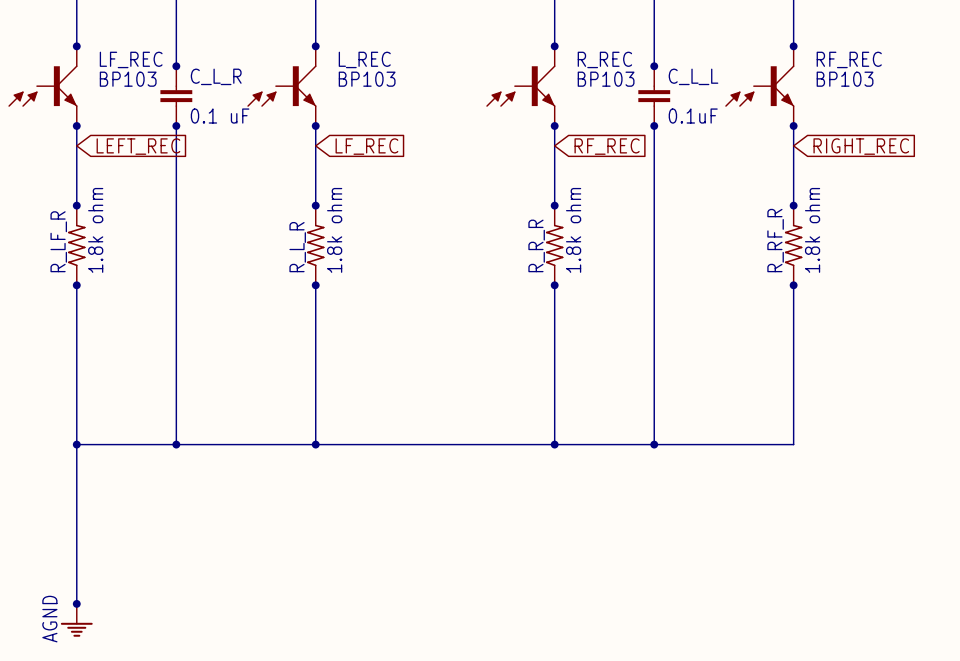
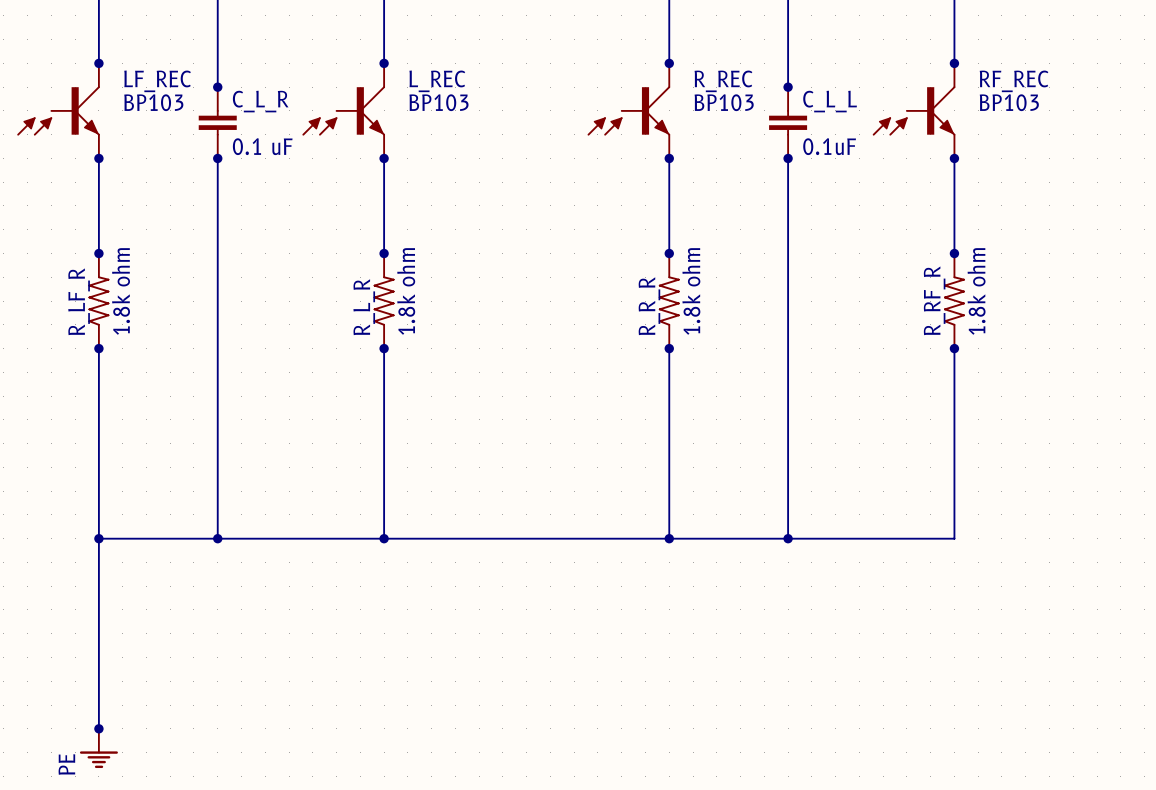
global label: LEFT_REC (138, 146) -> none
global label: LF_REC (366, 146) -> none
global label: RF_REC (607, 146) -> none
global label: RIGHT_REC (861, 146) -> none
power symbol: AGND (76, 620) -> PE (98, 748)

